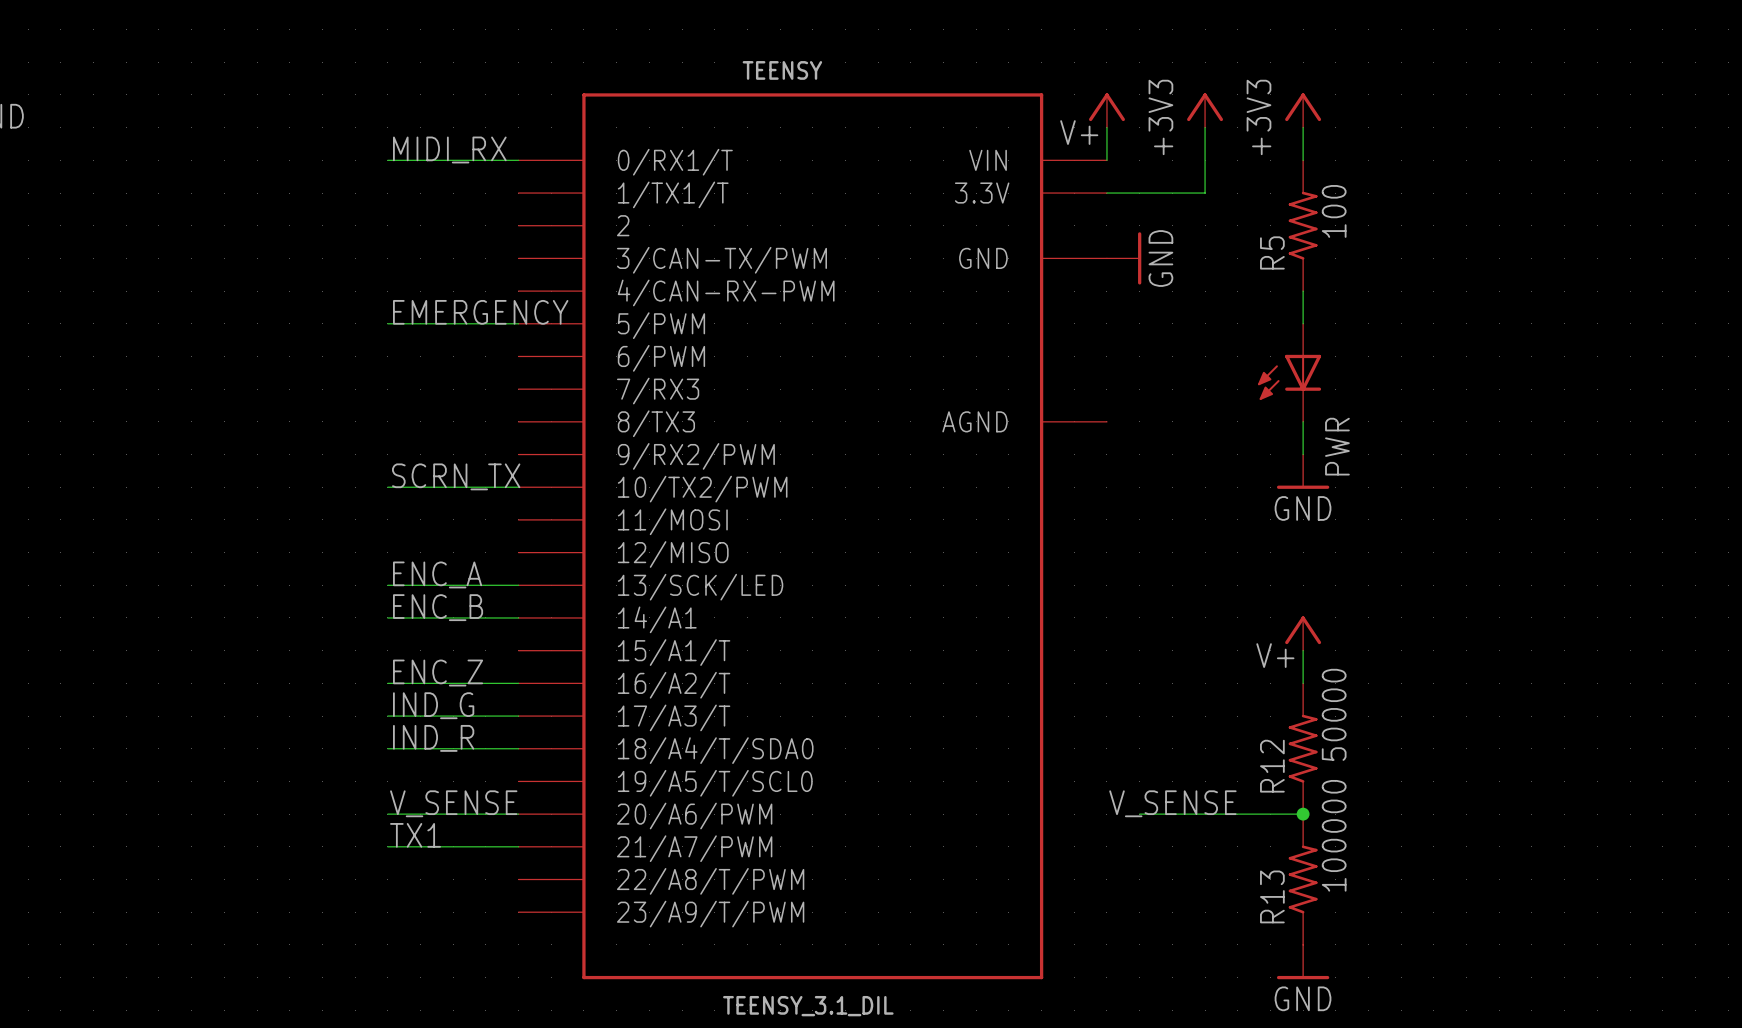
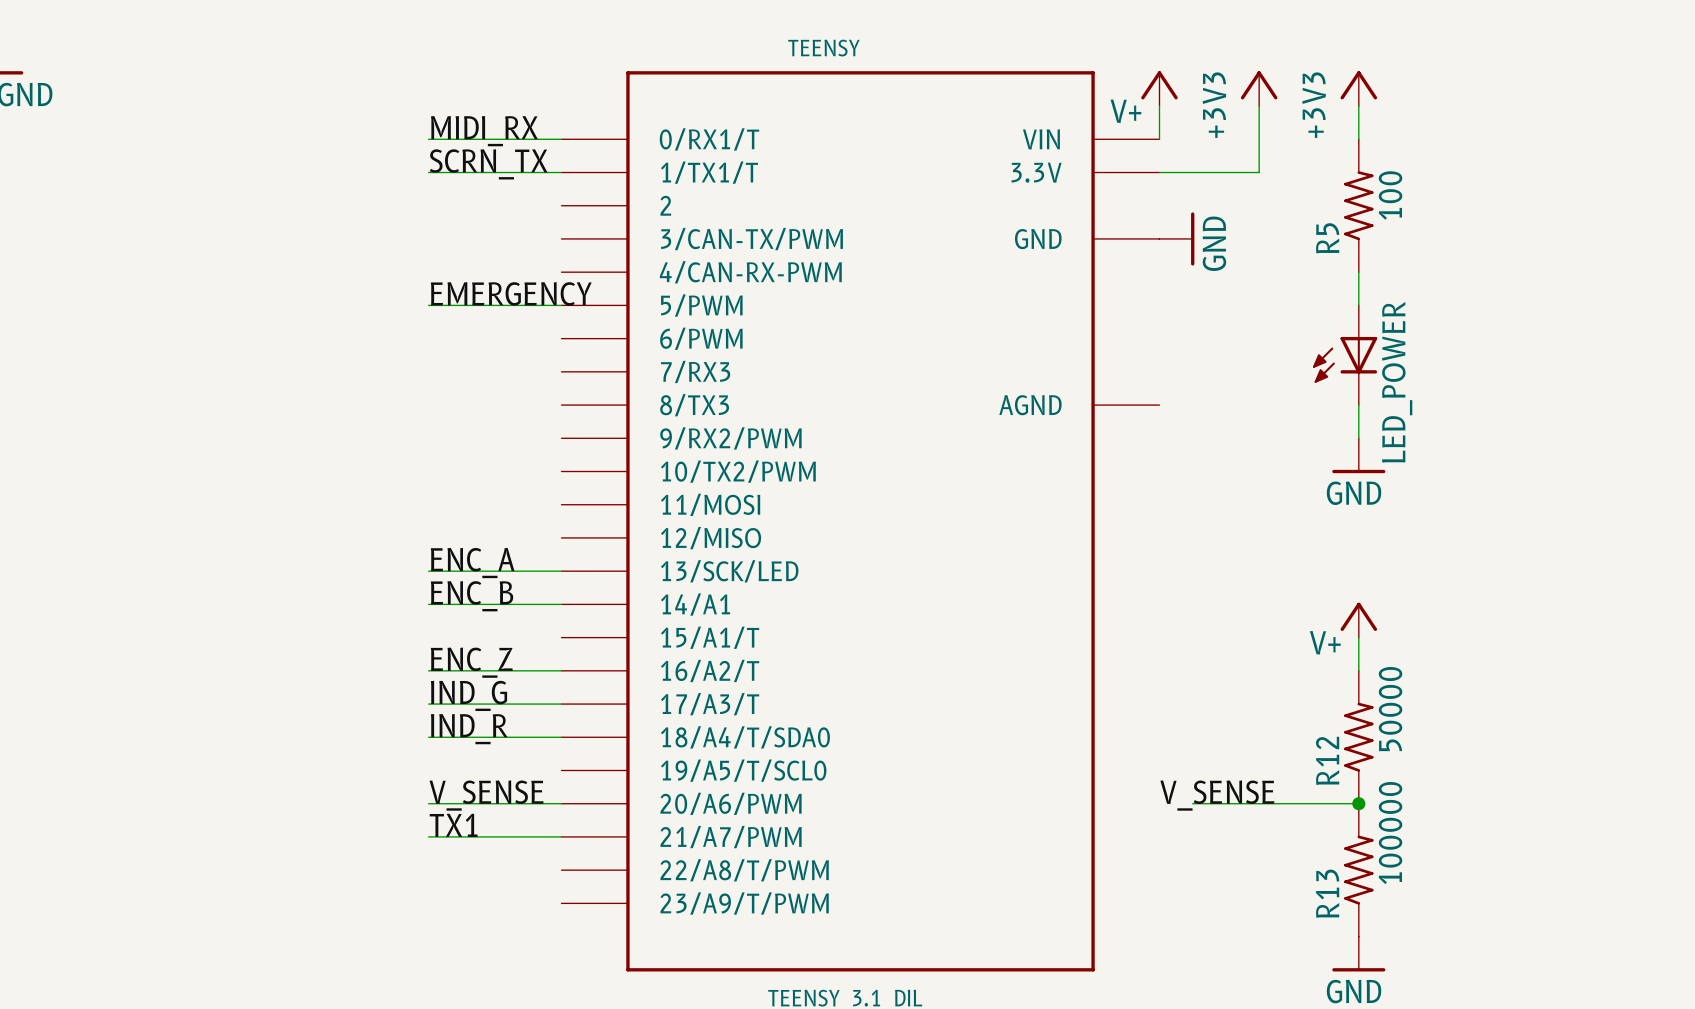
PWR name: PWR (1337, 446) -> LED_POWER (1397, 382)
label position: SCRN_TX (456, 476) -> SCRN_TX (488, 164)
wire: (387, 487) (518, 487) -> (428, 172) (561, 172)

